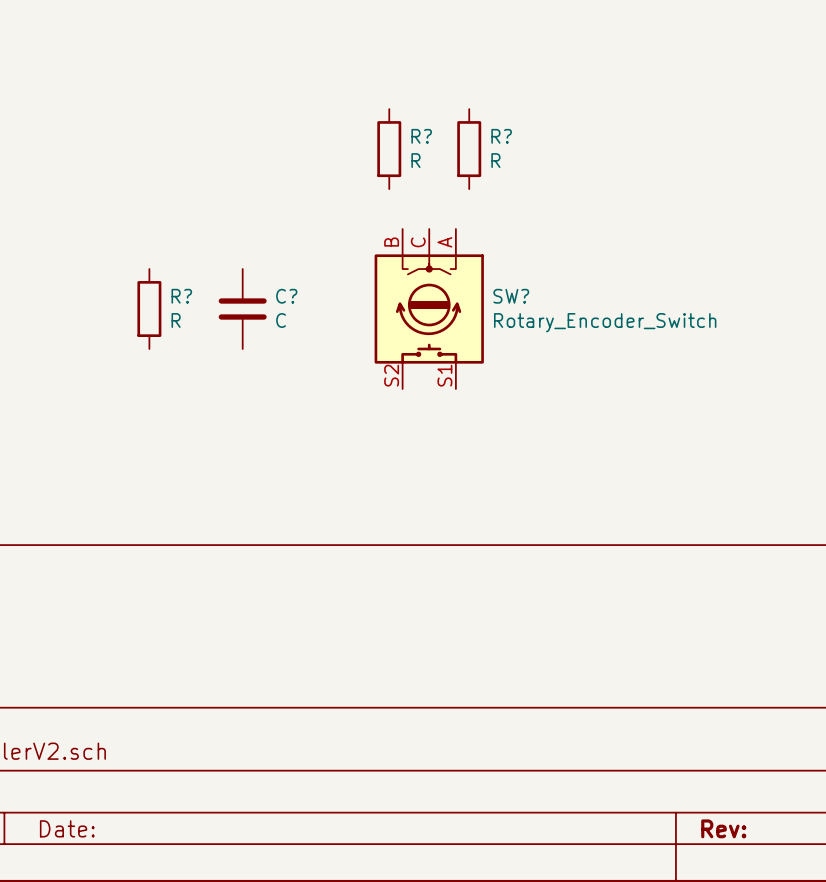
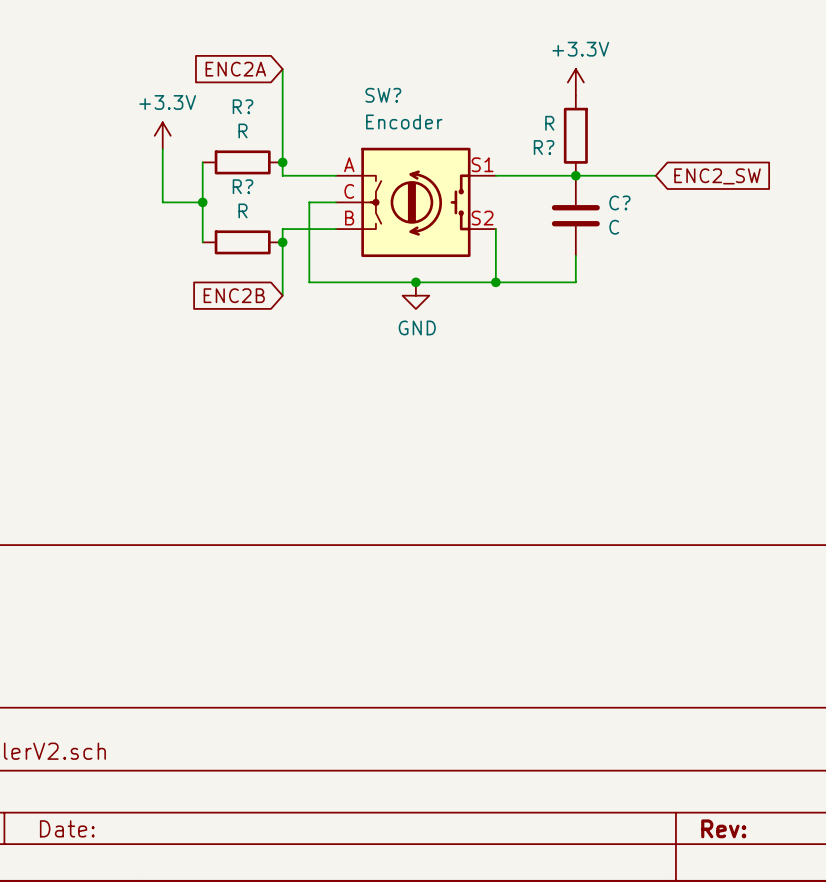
global label: none -> ENC2A (235, 69)
wire: none -> (282, 69) (282, 175) (335, 175)
power symbol: none -> +3.3V (575, 82)
power symbol: none -> +3.3V (162, 135)
R?: none -> R (575, 135)
wire: none -> (162, 149) (162, 202) (202, 202)
R?: R (389, 149) -> none
R?: R (469, 149) -> none
wire: none -> (202, 162) (202, 242)
R?: none -> R (242, 162)
junction: none -> (282, 162)
wire: none -> (495, 175) (655, 175)
junction: none -> (575, 175)
global label: none -> ENC2_SW (717, 176)
junction: none -> (202, 202)
wire: none -> (335, 202) (309, 202) (309, 282) (575, 282) (575, 255)
SW?: none -> Encoder (415, 202)
C?: none -> C (575, 215)
wire: none -> (335, 229) (282, 229) (282, 295)
wire: none -> (495, 229) (495, 282)
R?: none -> R (242, 242)
junction: none -> (282, 242)
junction: none -> (415, 282)
junction: none -> (495, 282)
global label: none -> ENC2B (234, 295)
power symbol: none -> GND (415, 295)
R?: R (149, 309) -> none
C?: C (242, 309) -> none
SW?: Rotary_Encoder_Switch (429, 309) -> none

